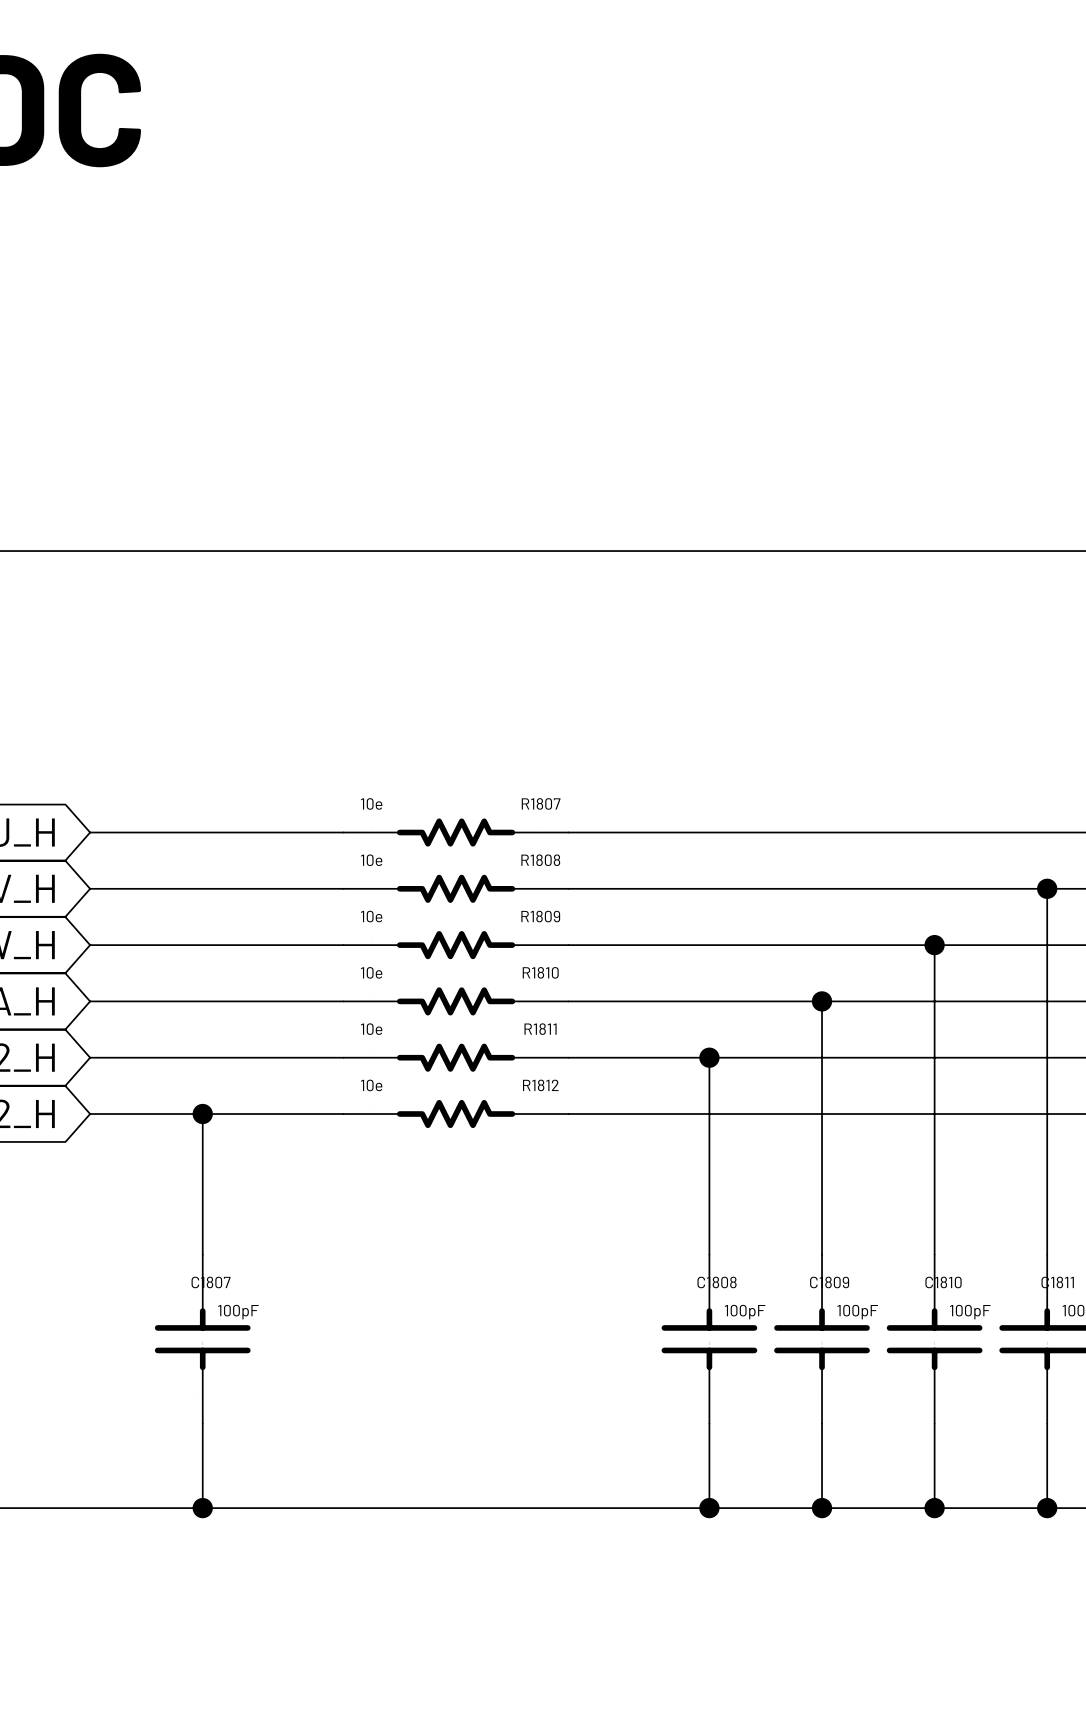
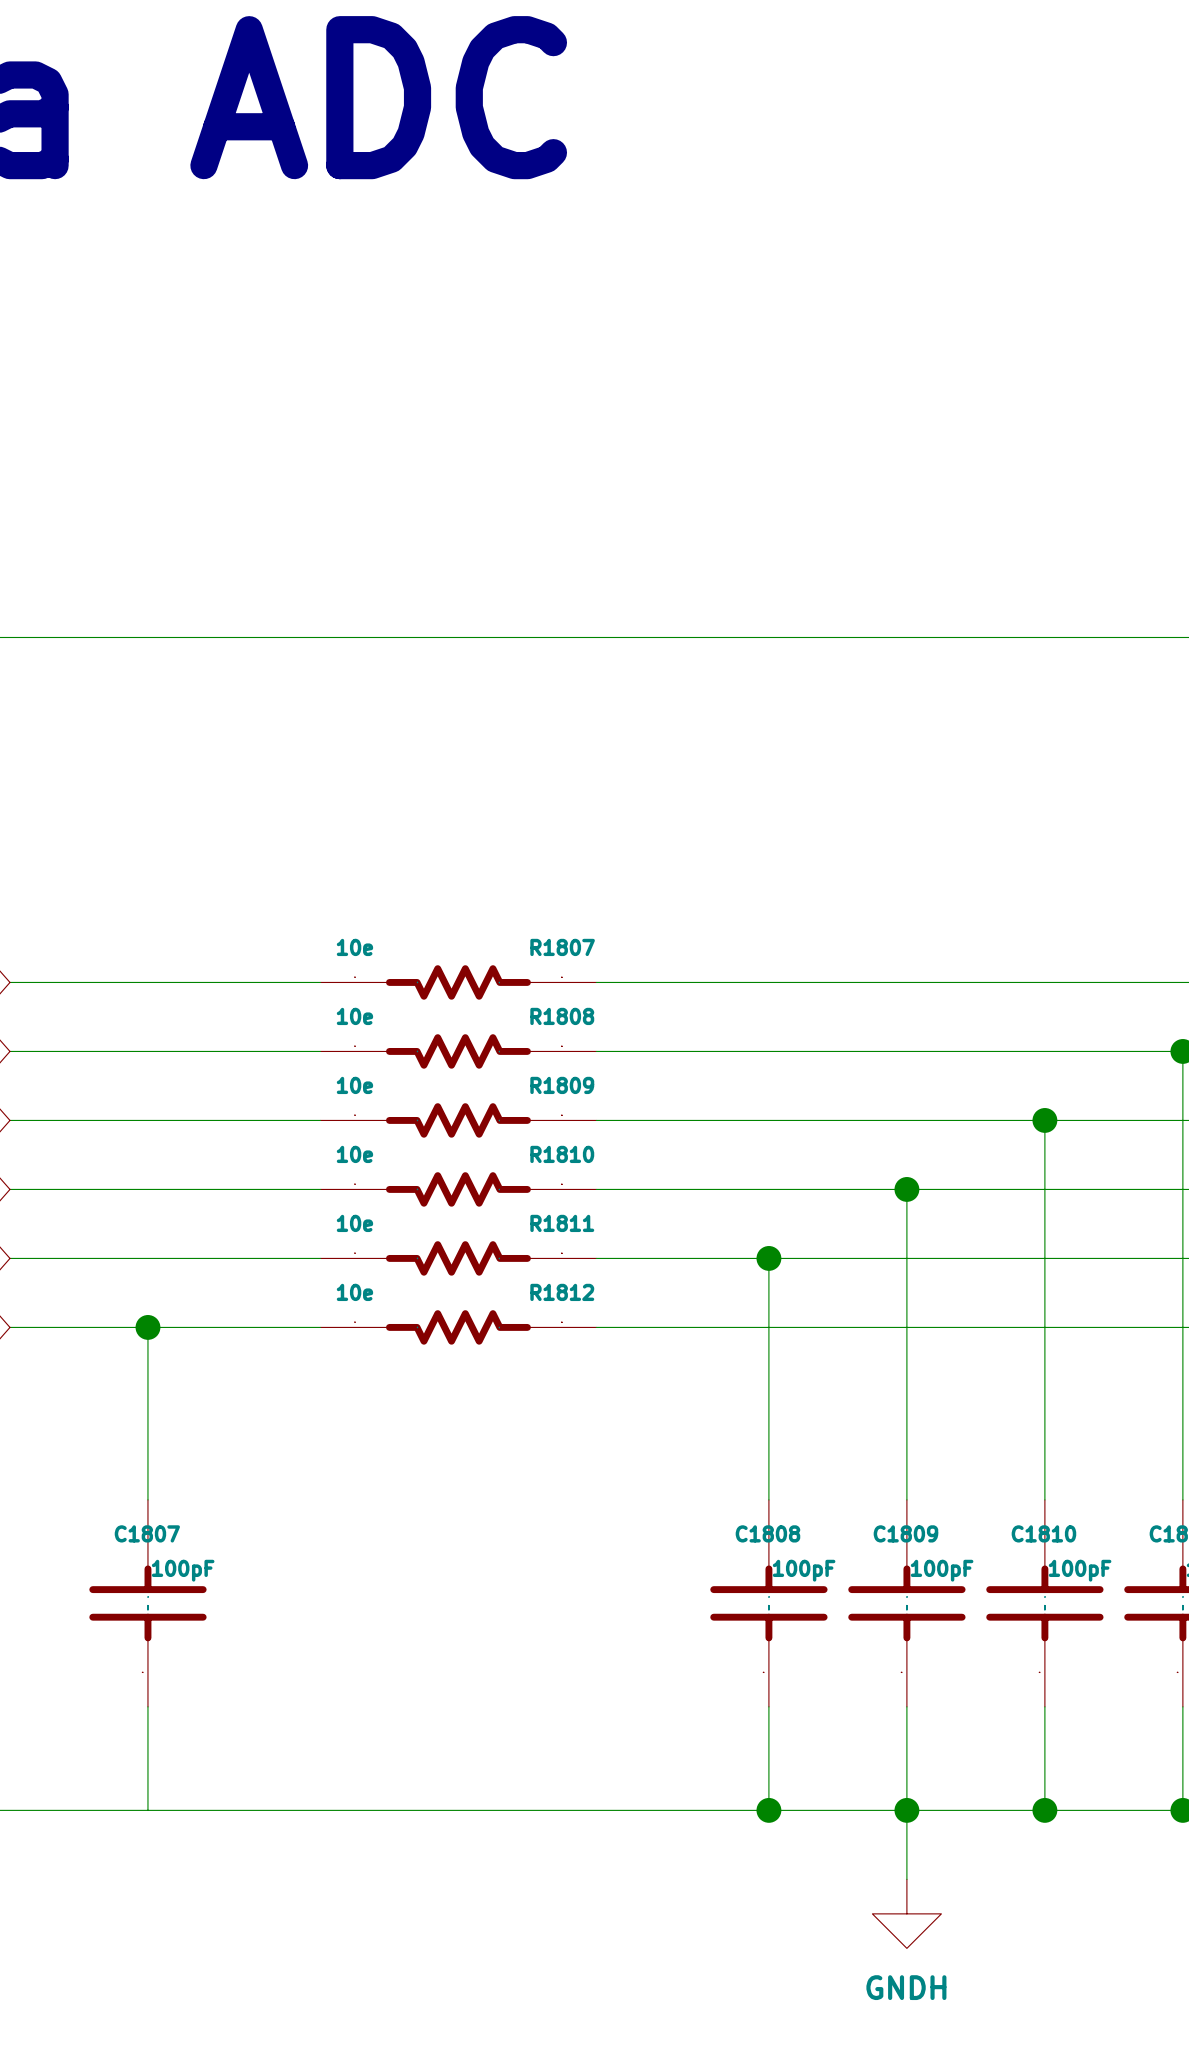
junction: (202, 1508) -> none
wire: none -> (906, 1810) (906, 1879)
power symbol: none -> GNDH (906, 1913)

